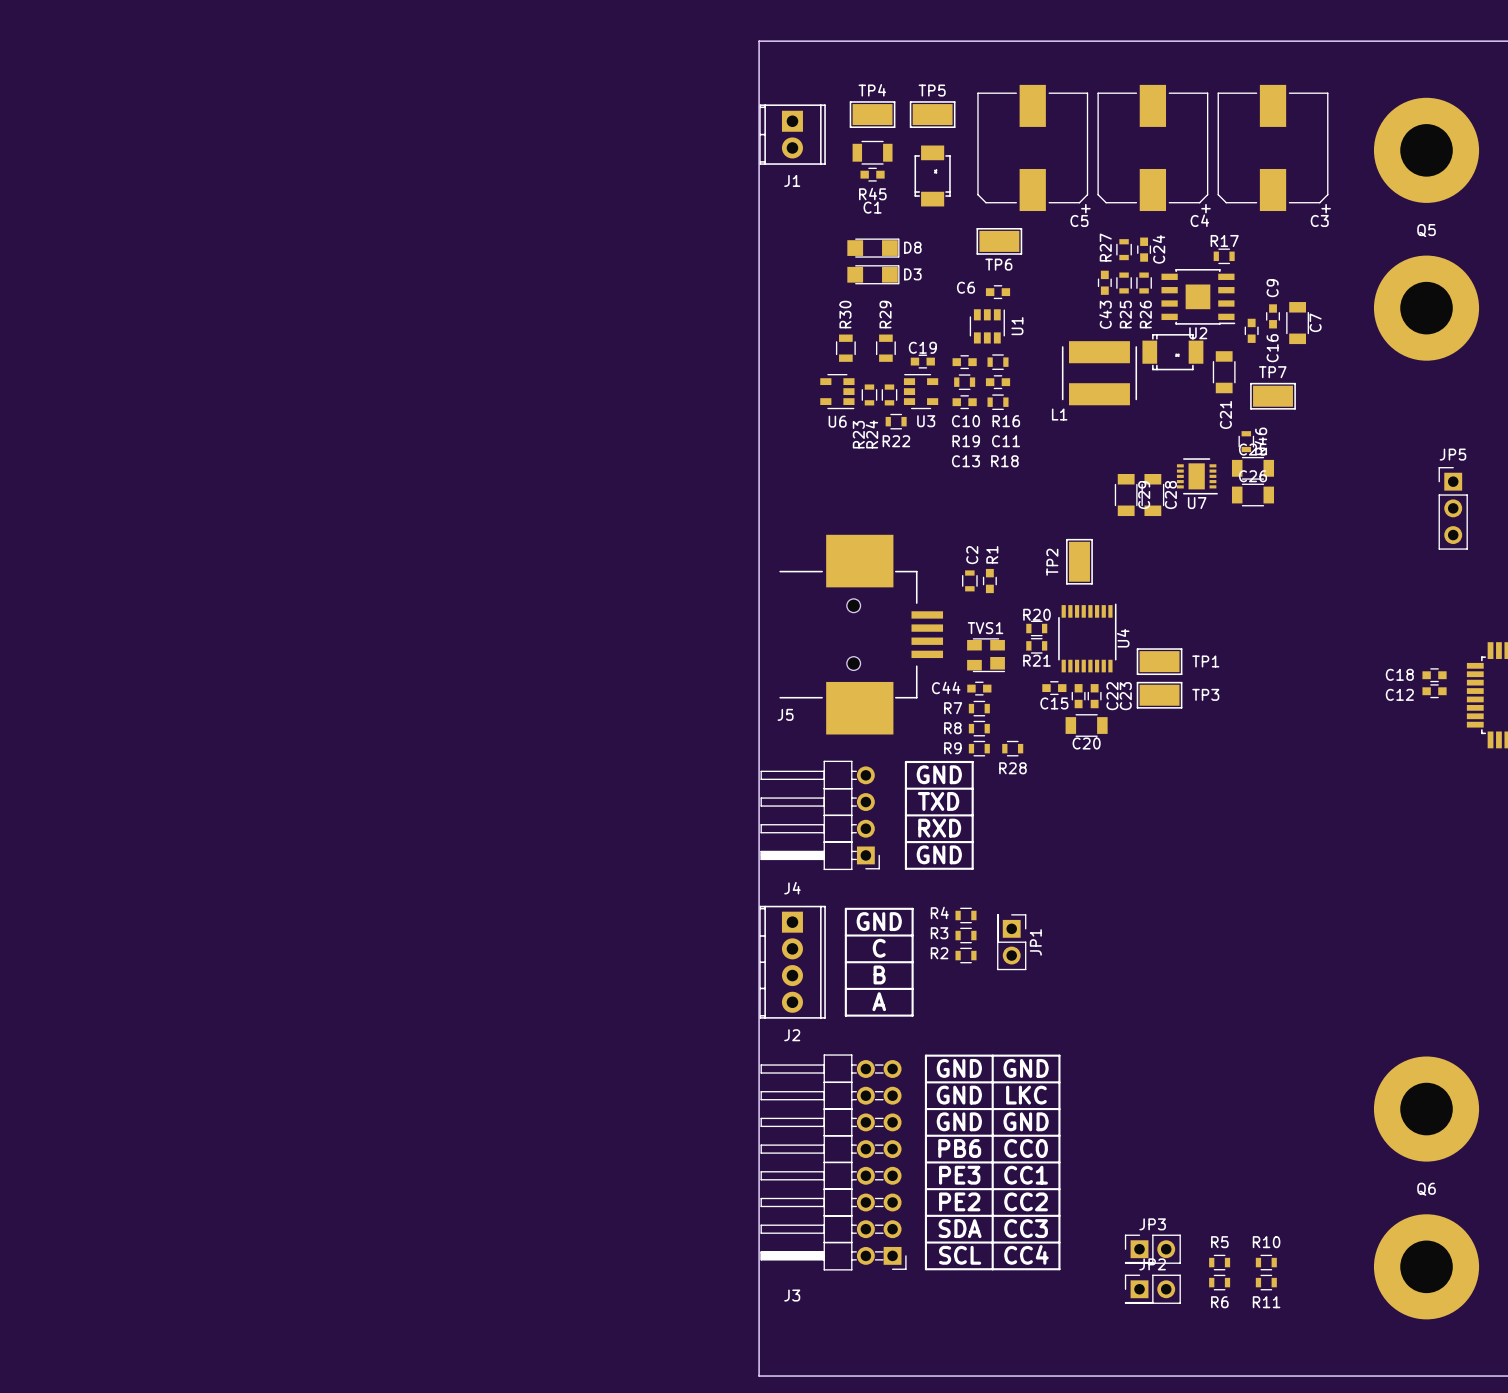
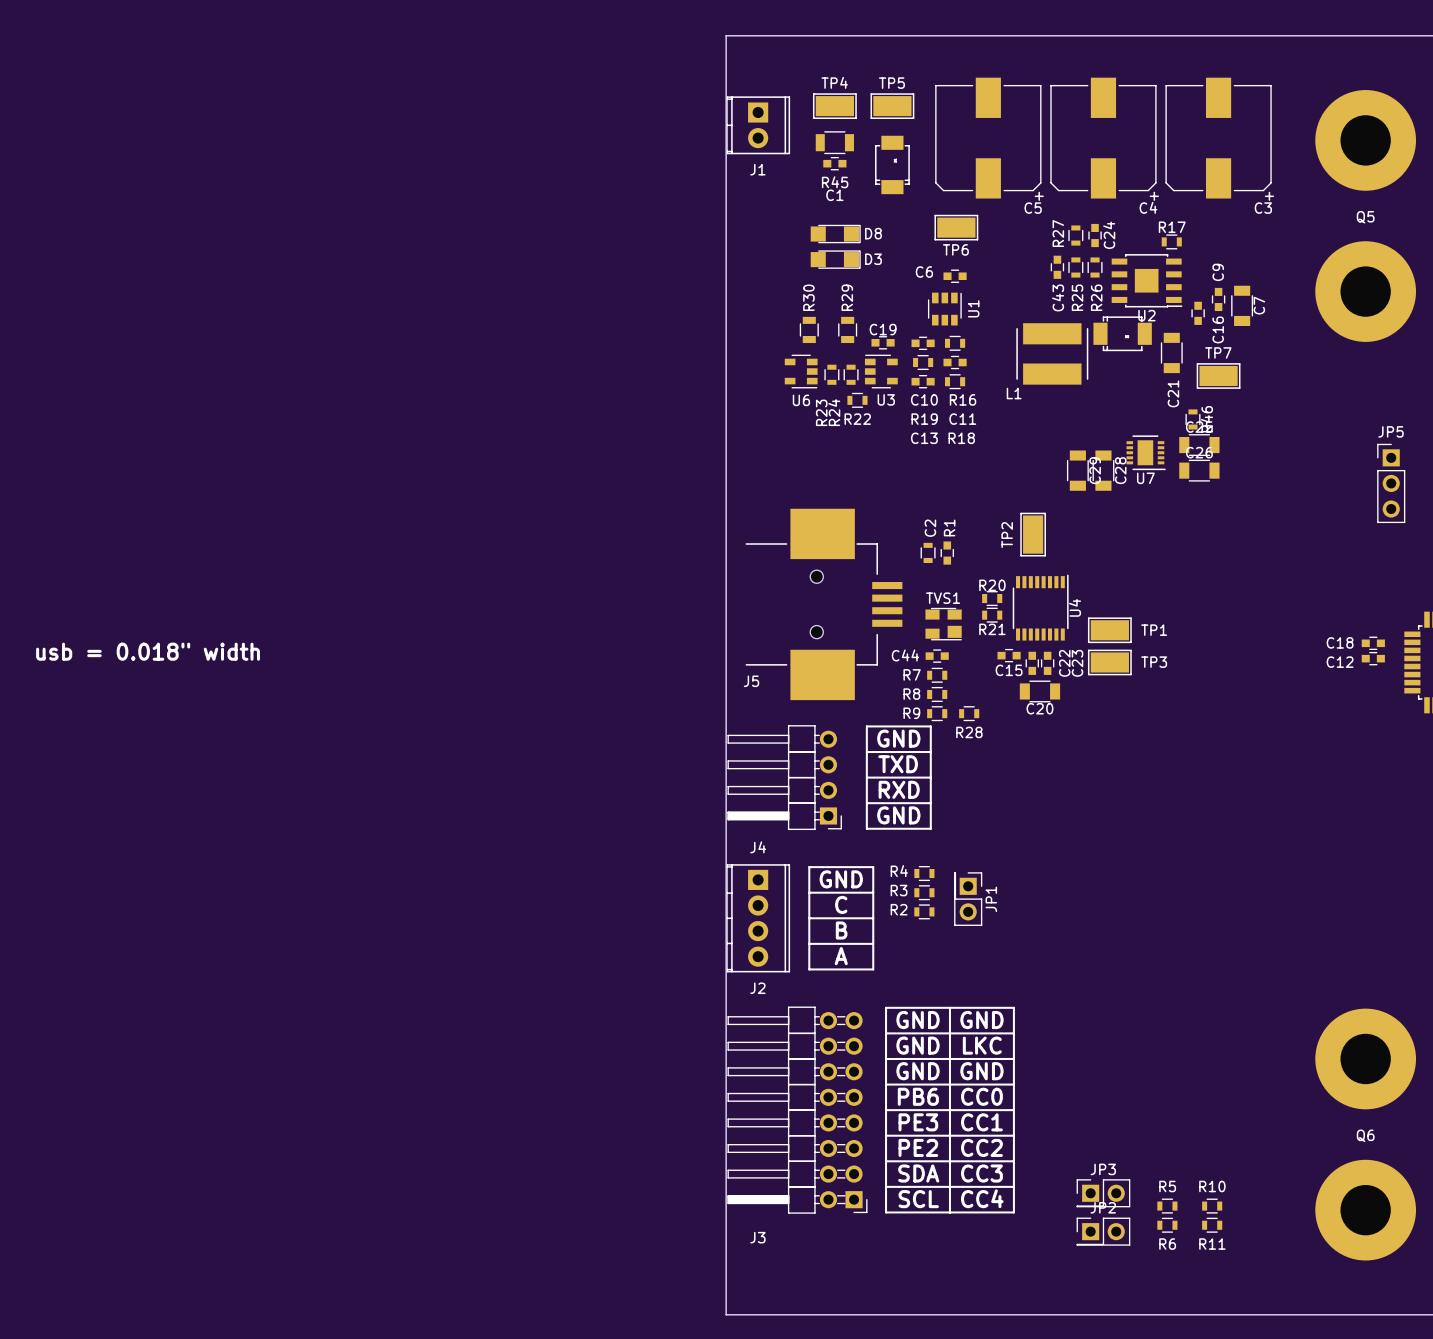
text: none -> usb = 0.018" width (148, 651)

